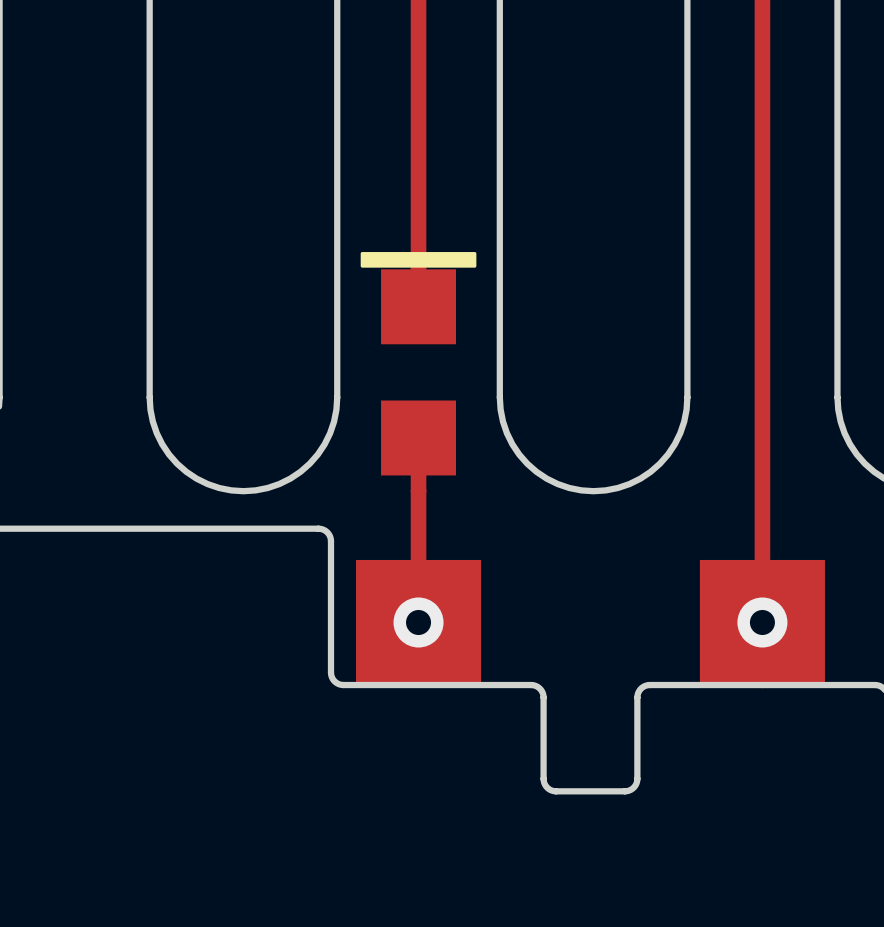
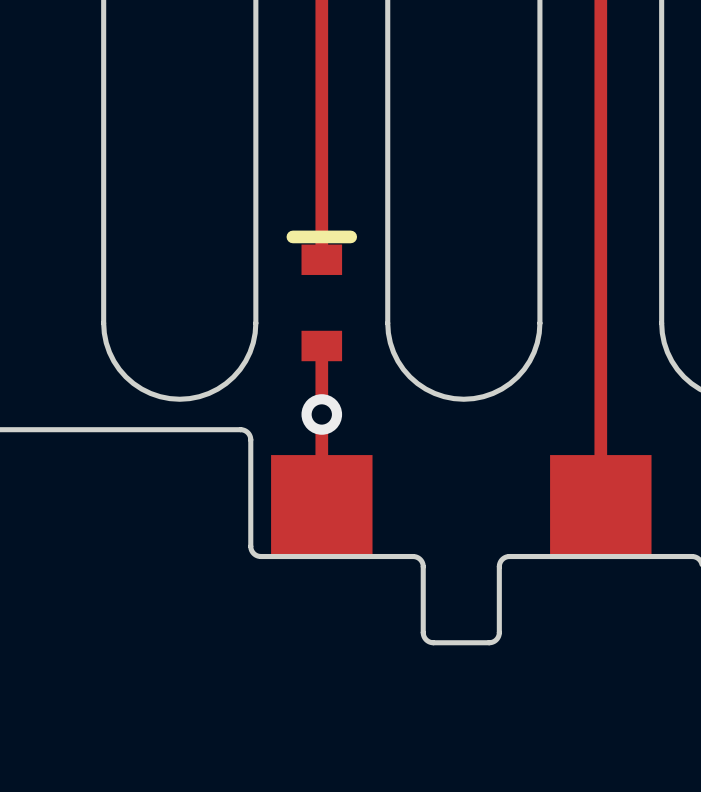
part footprint: [360, 252, 477, 476] -> [286, 230, 358, 362]
via position: (418, 622) -> (321, 414)
via: (762, 622) -> none

